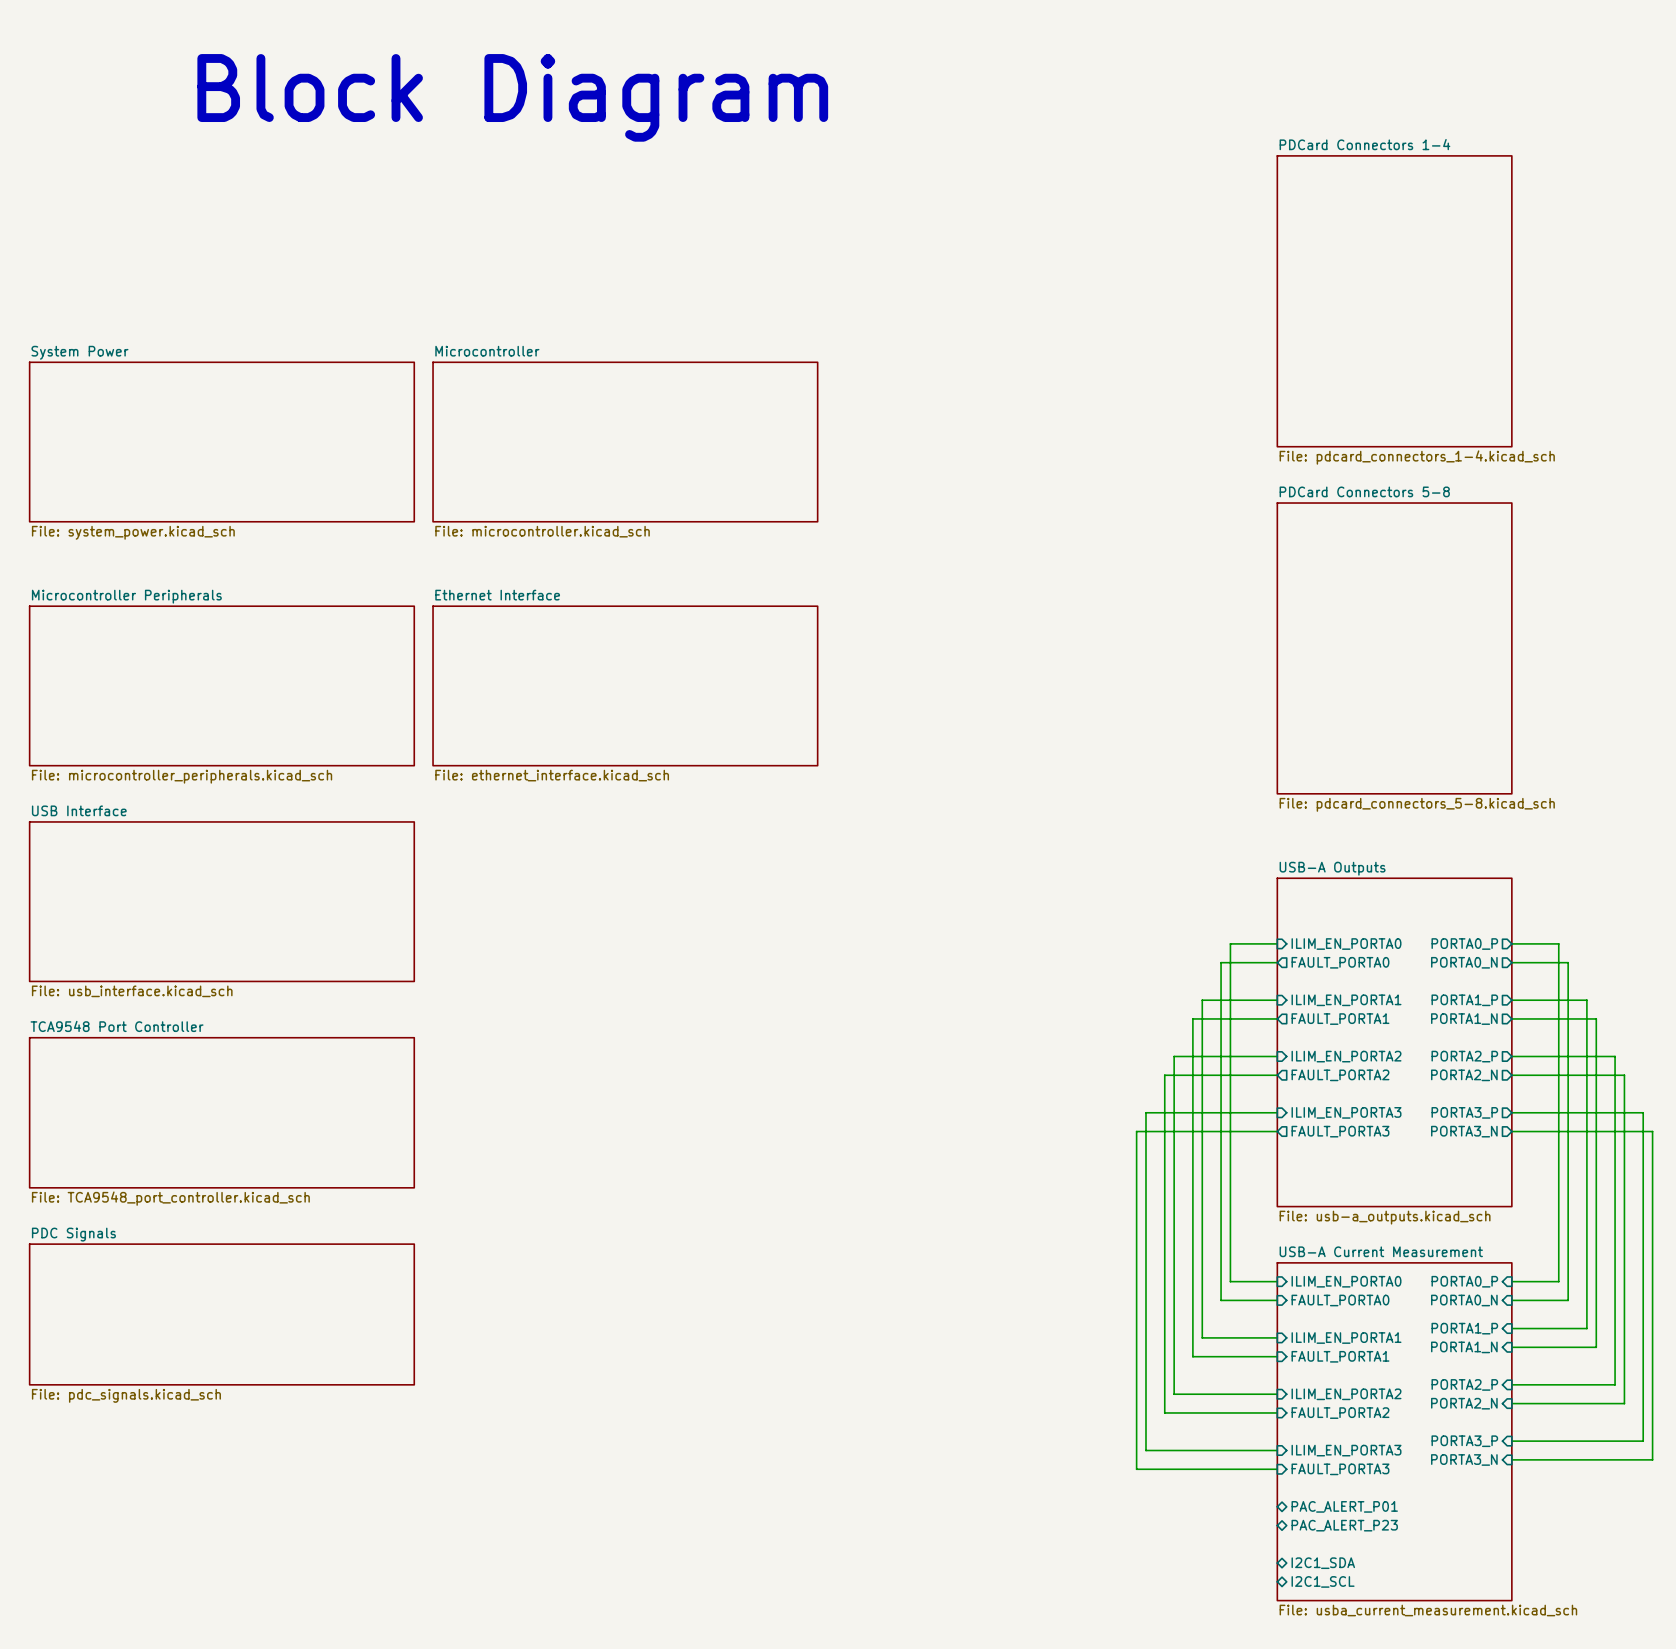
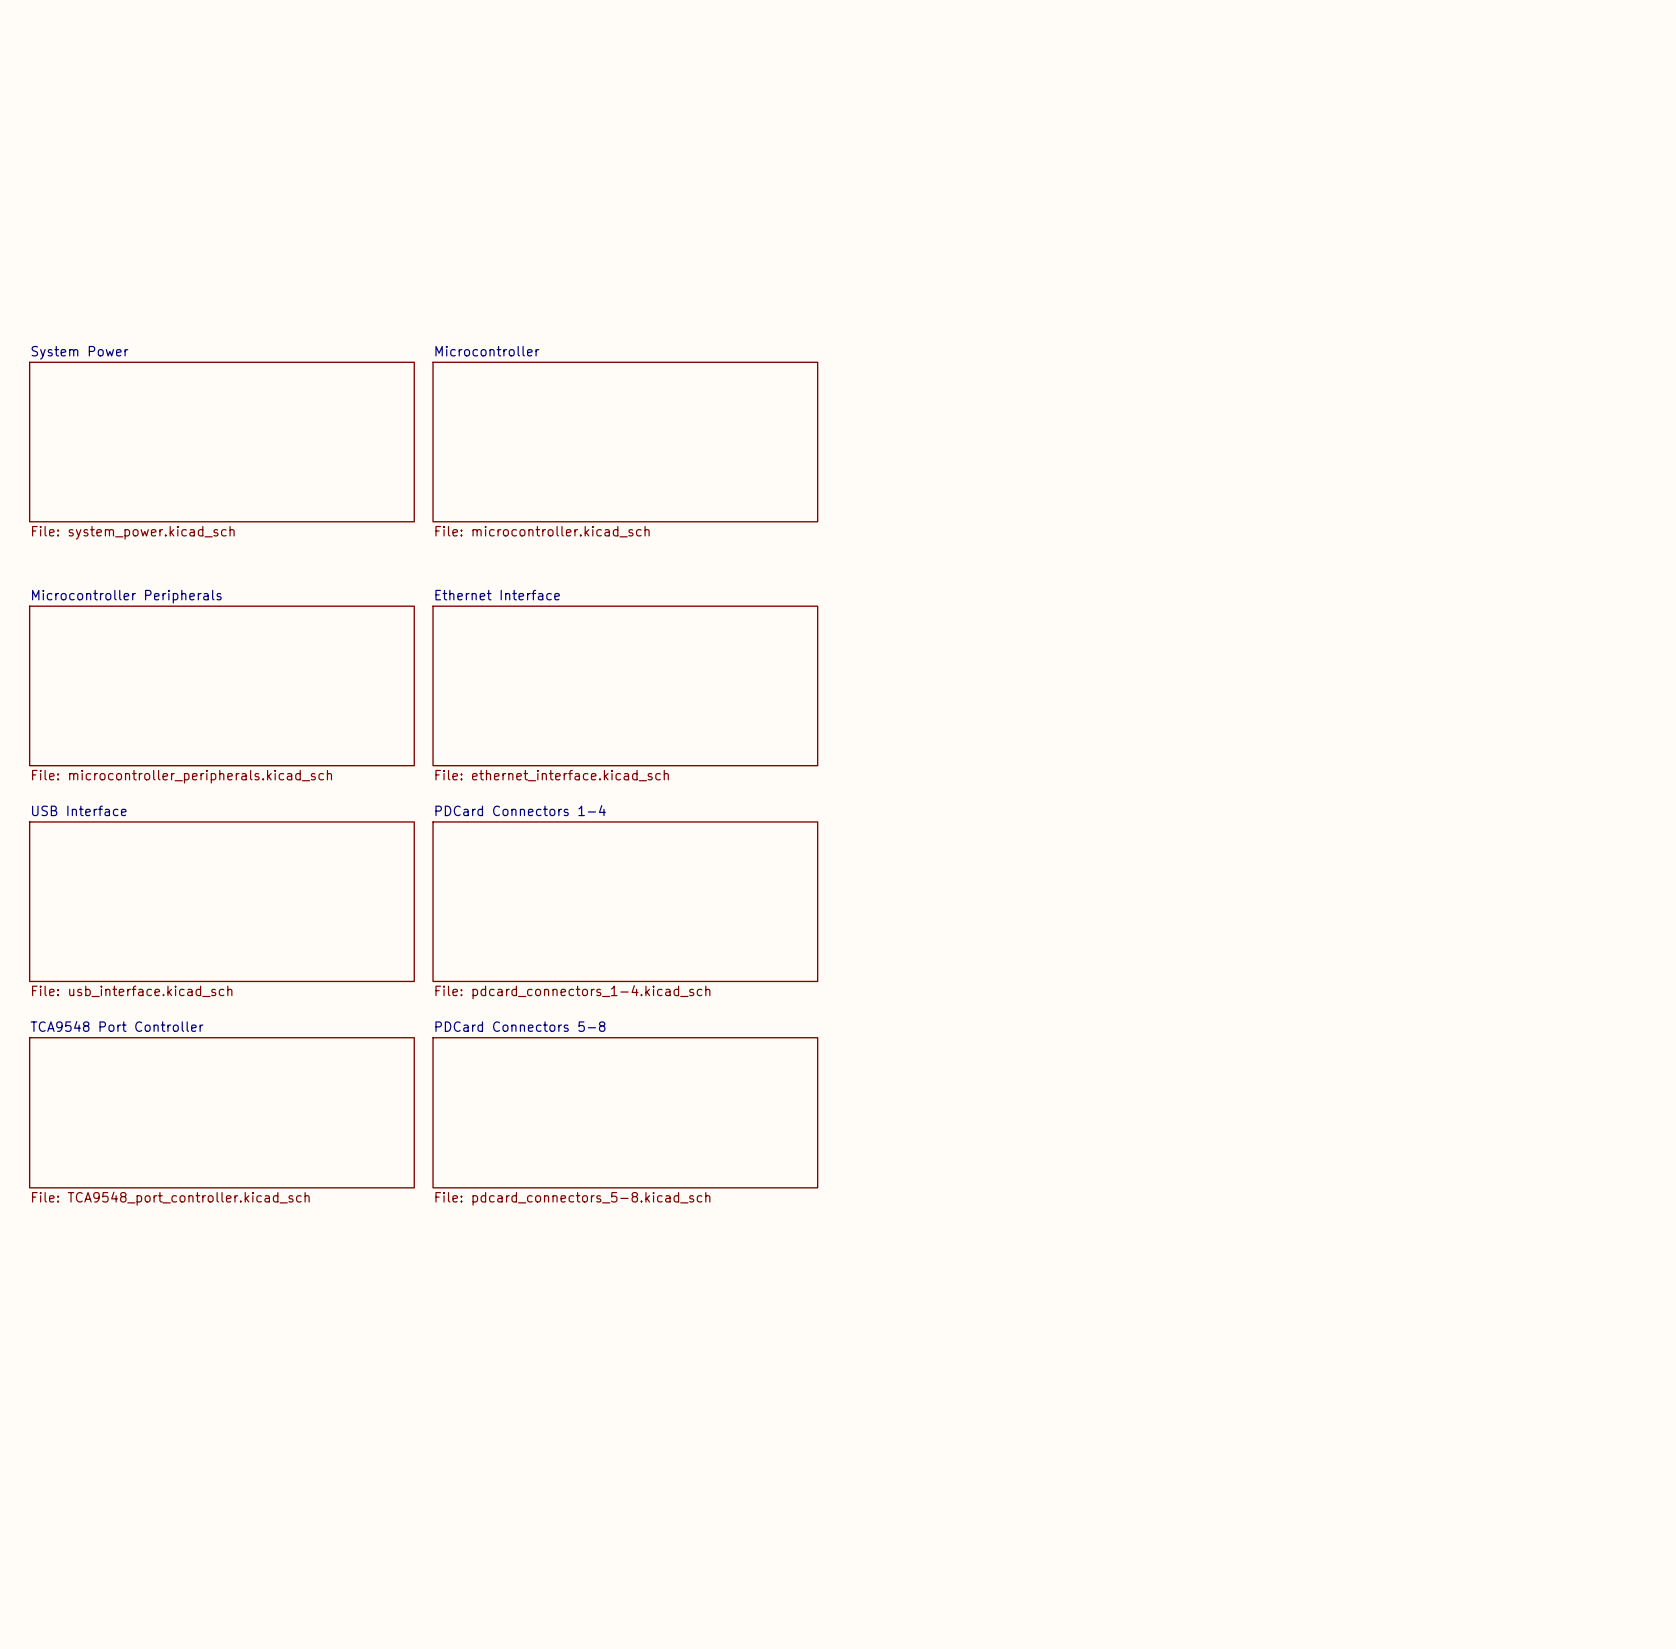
text: Block Diagram (512, 97) -> none
sheet PDCard Connectors 1-4 name position: PDCard Connectors 1-4 (1364, 144) -> PDCard Connectors 1-4 (520, 810)
sheet PDCard Connectors 1-4 shape: [1276, 155, 1513, 448] -> [432, 821, 819, 983]
sheet PDCard Connectors 1-4 value position: File: pdcard_connectors_1-4.kicad_sch (1417, 457) -> File: pdcard_connectors_1-4.kicad_sch (572, 992)
sheet PDCard Connectors 5-8 name position: PDCard Connectors 5-8 (1364, 491) -> PDCard Connectors 5-8 (520, 1026)
sheet PDCard Connectors 5-8 shape: [1276, 502, 1513, 795] -> [432, 1037, 819, 1189]
sheet PDCard Connectors 5-8 value position: File: pdcard_connectors_5-8.kicad_sch (1417, 804) -> File: pdcard_connectors_5-8.kicad_sch (572, 1198)
wire: (1277, 943) (1230, 943) (1230, 1281) (1277, 1281) -> none
wire: (1511, 943) (1558, 943) (1558, 1281) (1511, 1281) -> none
sheet pin: ILIM_EN_PORTA0 (1346, 944) -> none
sheet pin: PORTA0_P (1464, 944) -> none
wire: (1277, 962) (1221, 962) (1221, 1300) (1277, 1300) -> none
sheet pin: FAULT_PORTA0 (1340, 962) -> none
sheet pin: PORTA0_N (1464, 962) -> none
wire: (1511, 962) (1568, 962) (1568, 1300) (1511, 1300) -> none
wire: (1277, 1000) (1202, 1000) (1202, 1337) (1277, 1337) -> none
sheet pin: ILIM_EN_PORTA1 (1346, 1000) -> none
sheet pin: PORTA1_P (1464, 1000) -> none
wire: (1511, 1000) (1586, 1000) (1586, 1328) (1511, 1328) -> none
wire: (1277, 1018) (1192, 1018) (1192, 1356) (1277, 1356) -> none
wire: (1511, 1018) (1596, 1018) (1596, 1347) (1511, 1347) -> none
sheet pin: FAULT_PORTA1 (1340, 1019) -> none
sheet pin: PORTA1_N (1464, 1019) -> none
sheet USB-A Outputs: File: usb-a_outputs.kicad_sch (1394, 1042) -> none
wire: (1277, 1056) (1174, 1056) (1174, 1394) (1277, 1394) -> none
sheet pin: ILIM_EN_PORTA2 (1346, 1056) -> none
sheet pin: PORTA2_P (1464, 1056) -> none
wire: (1511, 1056) (1615, 1056) (1615, 1384) (1511, 1384) -> none
wire: (1277, 1075) (1164, 1075) (1164, 1412) (1277, 1412) -> none
sheet pin: FAULT_PORTA2 (1340, 1075) -> none
sheet pin: PORTA2_N (1464, 1075) -> none
wire: (1511, 1075) (1624, 1075) (1624, 1403) (1511, 1403) -> none
wire: (1277, 1112) (1145, 1112) (1145, 1450) (1277, 1450) -> none
sheet pin: ILIM_EN_PORTA3 (1346, 1112) -> none
sheet pin: PORTA3_P (1464, 1112) -> none
wire: (1511, 1112) (1643, 1112) (1643, 1441) (1511, 1441) -> none
wire: (1277, 1131) (1136, 1131) (1136, 1469) (1277, 1469) -> none
sheet pin: FAULT_PORTA3 (1340, 1131) -> none
sheet pin: PORTA3_N (1464, 1131) -> none
wire: (1511, 1131) (1652, 1131) (1652, 1459) (1511, 1459) -> none
sheet pin: ILIM_EN_PORTA0 (1346, 1281) -> none
sheet pin: PORTA0_P (1464, 1281) -> none
sheet pin: FAULT_PORTA0 (1340, 1300) -> none
sheet pin: PORTA0_N (1464, 1300) -> none
sheet PDC Signals: File: pdc_signals.kicad_sch (221, 1314) -> none
sheet pin: PORTA1_P (1464, 1328) -> none
sheet pin: ILIM_EN_PORTA1 (1346, 1338) -> none
sheet pin: PORTA1_N (1464, 1347) -> none
sheet pin: FAULT_PORTA1 (1340, 1356) -> none
sheet pin: PORTA2_P (1464, 1384) -> none
sheet pin: ILIM_EN_PORTA2 (1346, 1394) -> none
sheet pin: PORTA2_N (1464, 1403) -> none
sheet pin: FAULT_PORTA2 (1340, 1413) -> none
sheet USB-A Current Measurement: File: usba_current_measurement.kicad_sch (1394, 1431) -> none
sheet pin: PORTA3_P (1464, 1441) -> none
sheet pin: ILIM_EN_PORTA3 (1346, 1450) -> none
sheet pin: PORTA3_N (1464, 1459) -> none
sheet pin: FAULT_PORTA3 (1340, 1469) -> none
sheet pin: PAC_ALERT_P01 (1344, 1506) -> none
sheet pin: PAC_ALERT_P23 (1344, 1525) -> none
sheet pin: I2C1_SDA (1323, 1563) -> none
sheet pin: I2C1_SCL (1323, 1581) -> none

